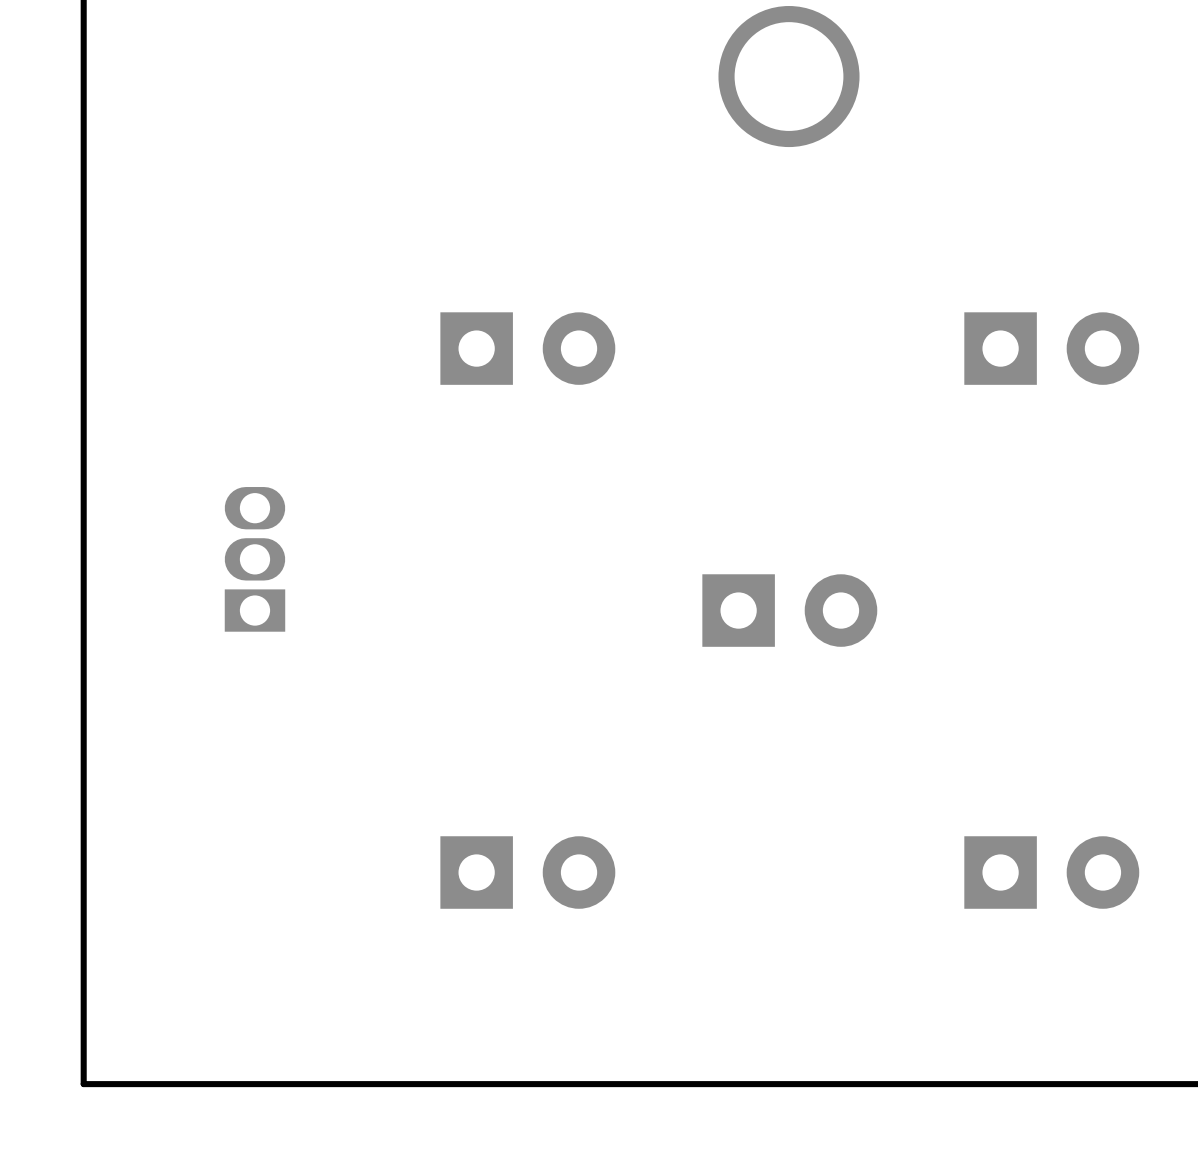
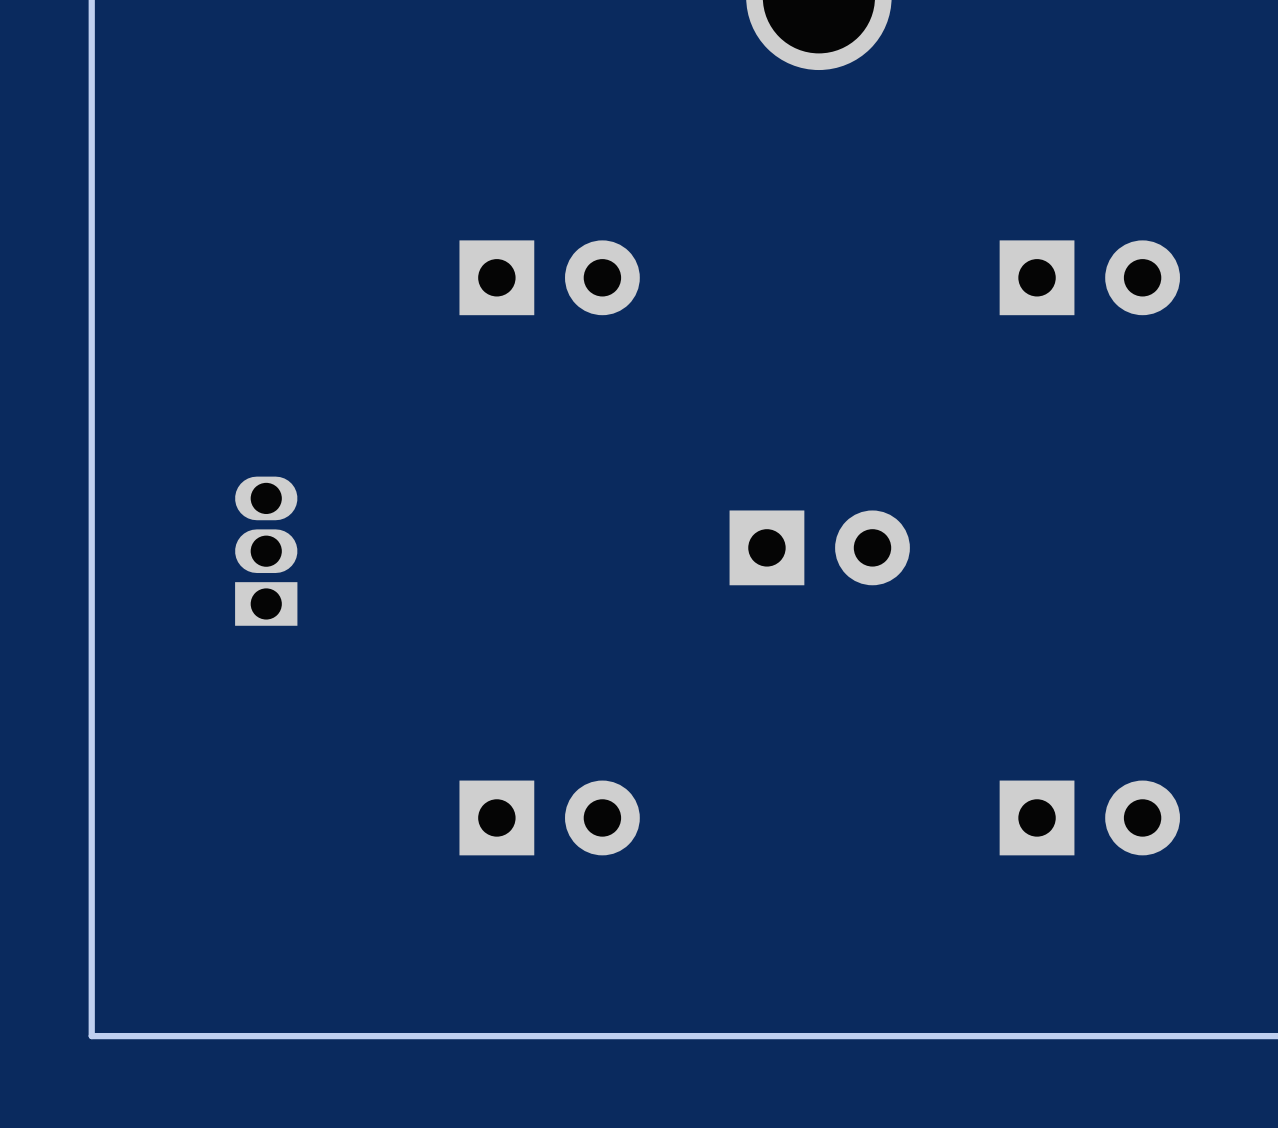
part position: (254, 559) -> (266, 551)

